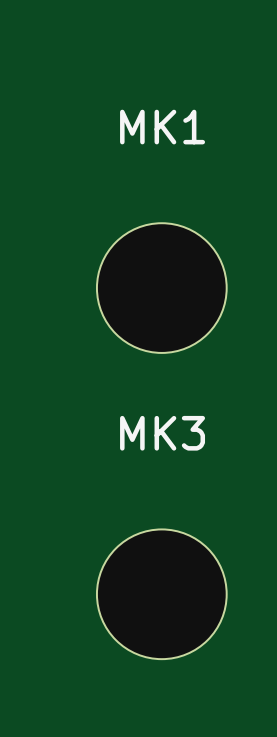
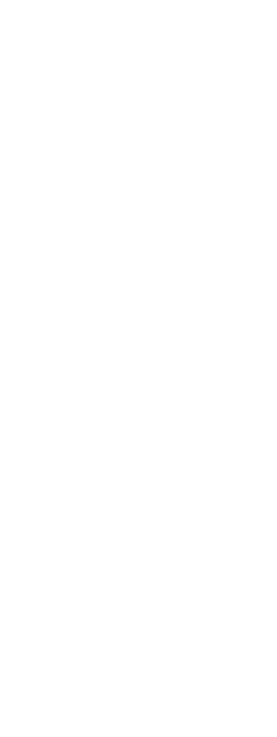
MK1: (161, 288) -> none
MK3: (161, 594) -> none

